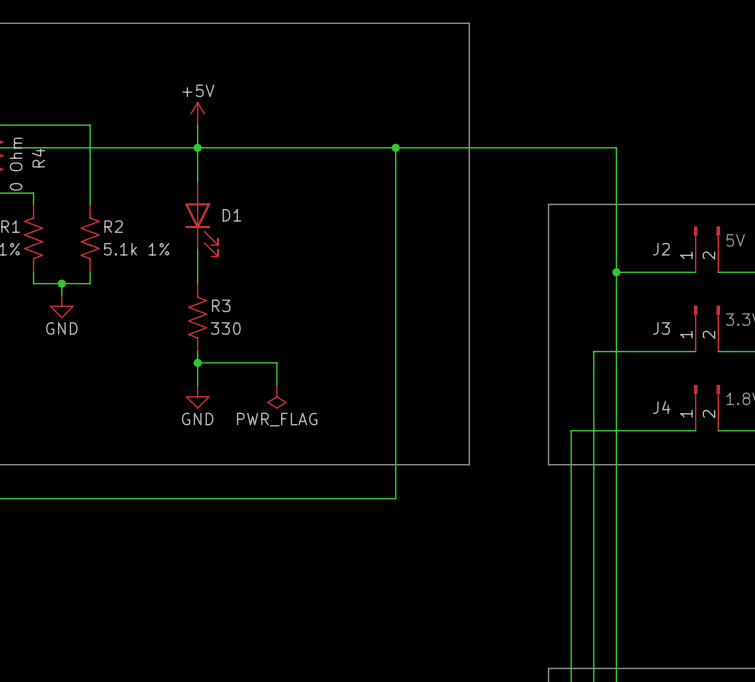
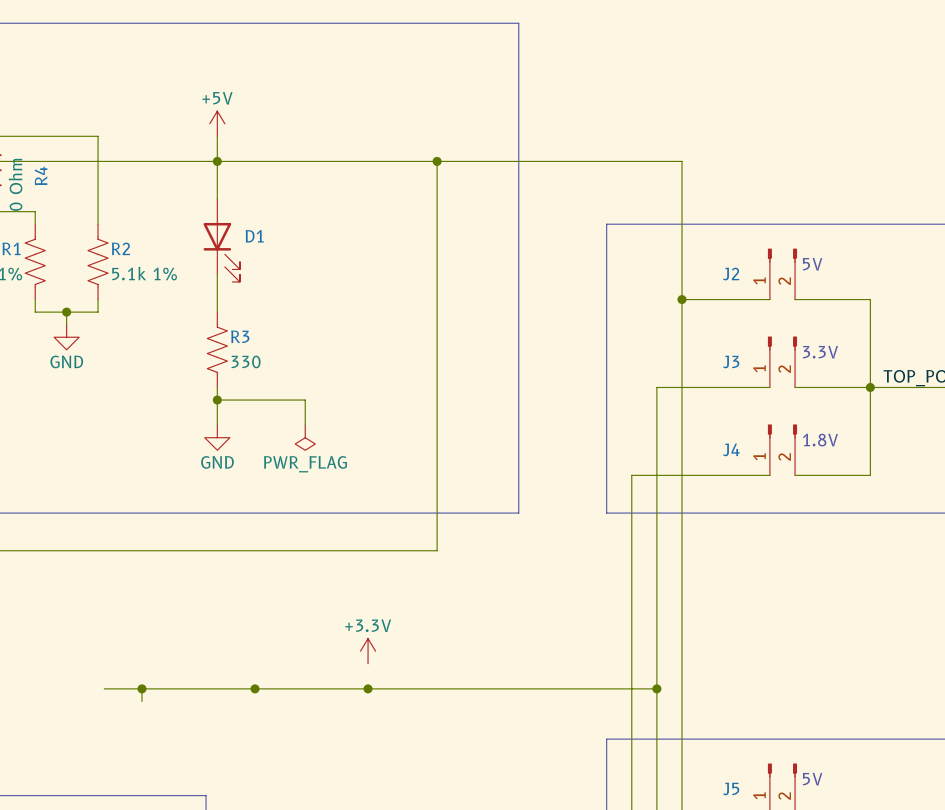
power symbol: none -> +3.3V (368, 651)
wire: none -> (104, 688) (656, 688)
wire: none -> (141, 688) (141, 701)
junction: none -> (141, 688)
junction: none -> (255, 688)
junction: none -> (368, 688)
junction: none -> (656, 688)

